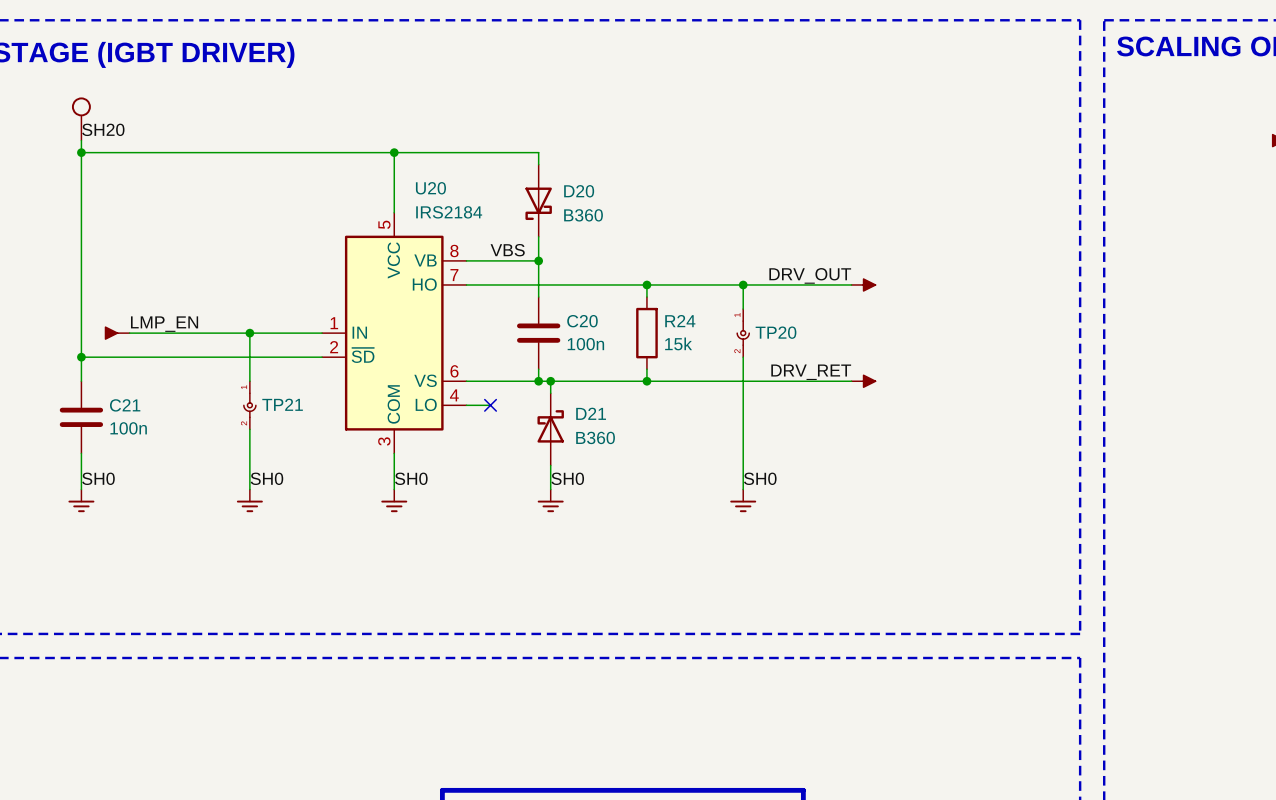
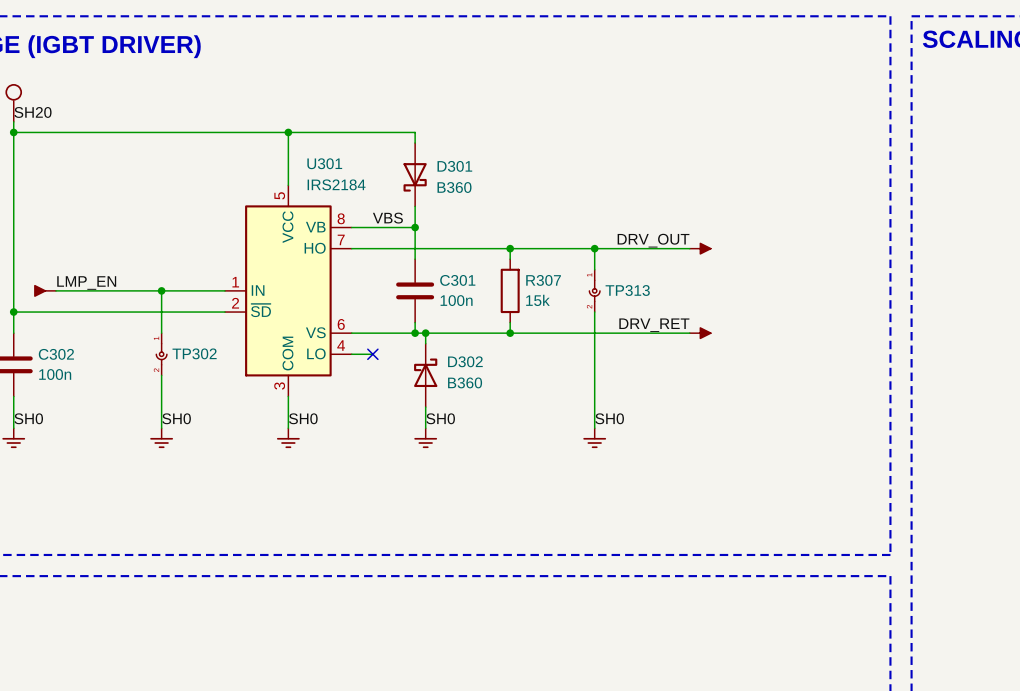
U20 name: U20 (430, 188) -> U301 (324, 163)
D20 name: D20 (579, 191) -> D301 (454, 166)
C20 name: C20 (582, 321) -> C301 (457, 280)
R24 name: R24 (680, 321) -> R307 (543, 280)
TP20 name: TP20 (776, 332) -> TP313 (627, 290)
TP21 name: TP21 (282, 404) -> TP302 (194, 353)
C21 name: C21 (125, 405) -> C302 (56, 354)
D21 name: D21 (591, 413) -> D302 (465, 361)

